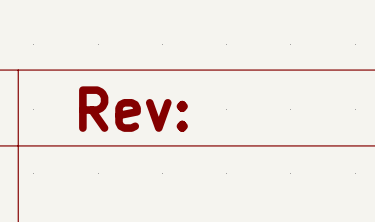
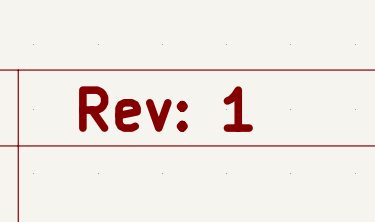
title block: Rev: (133, 109) -> Rev: 1 (165, 109)

